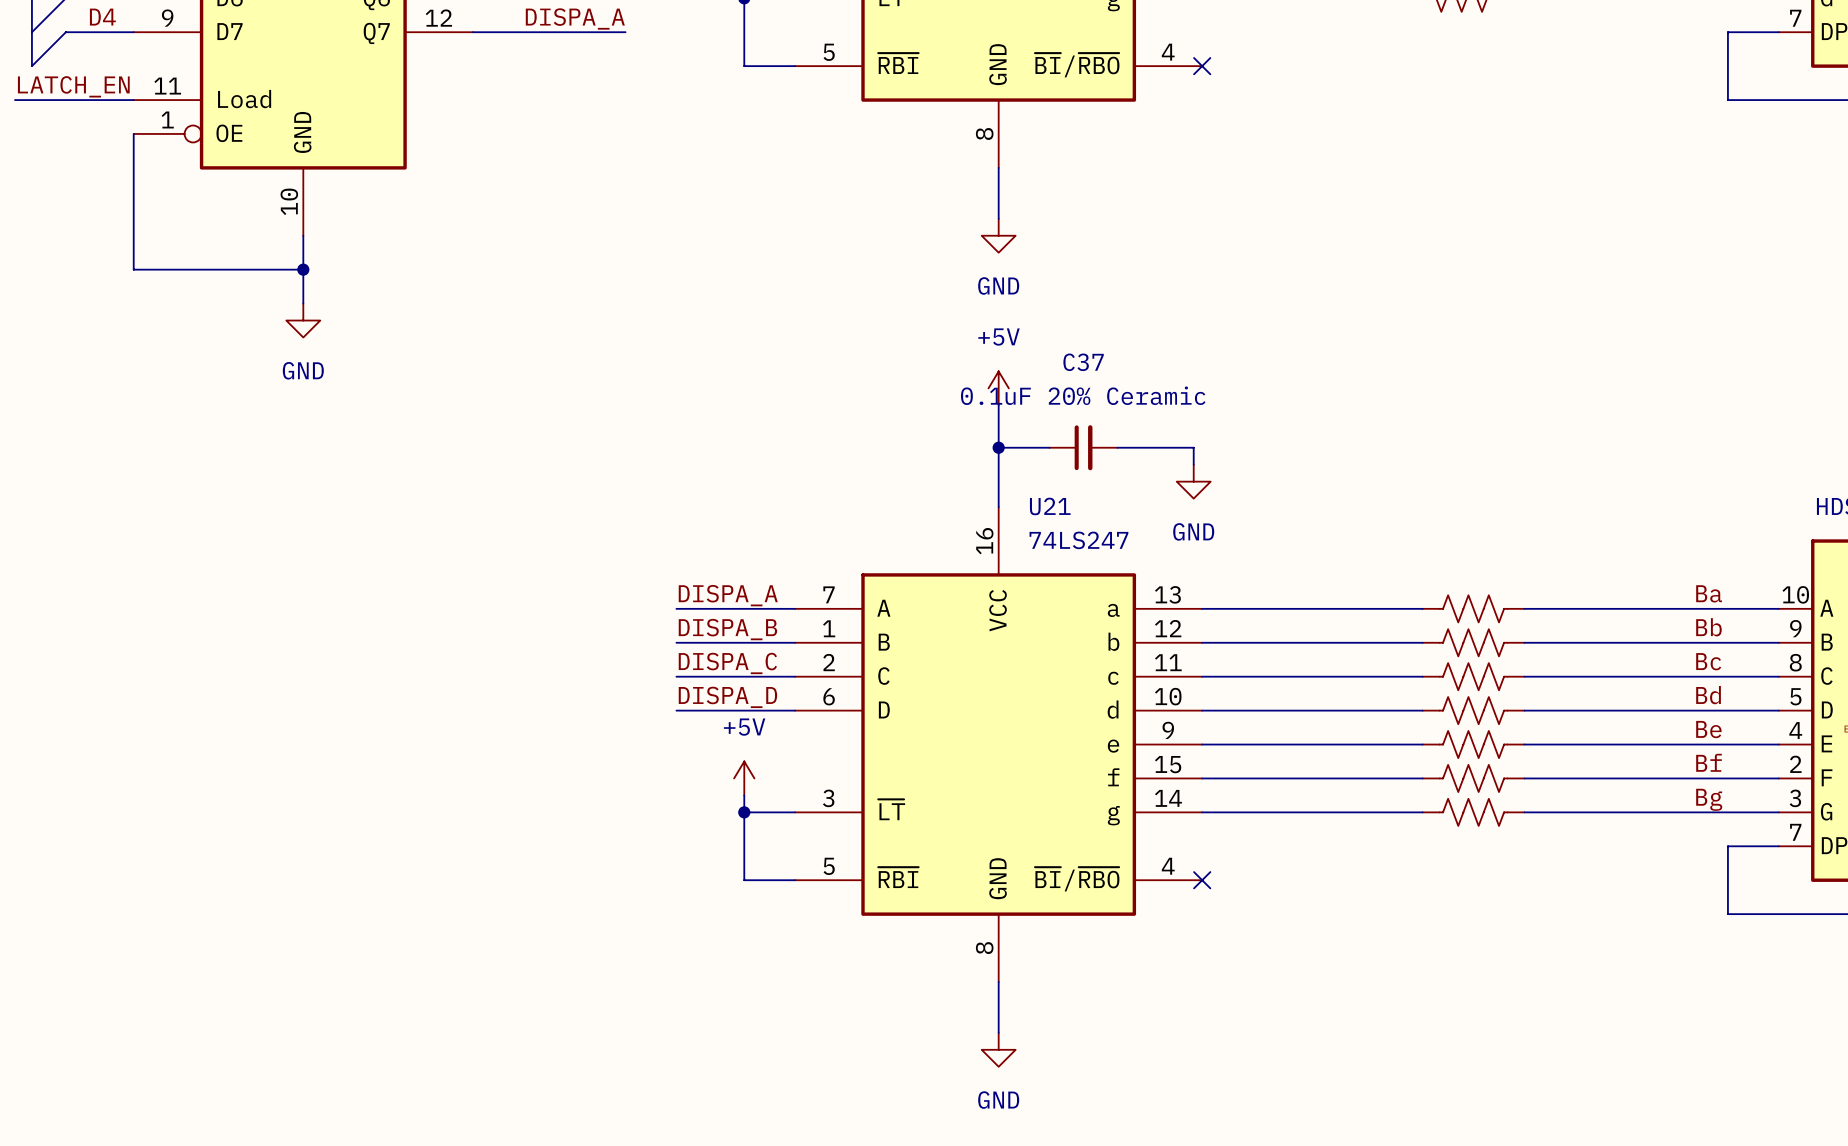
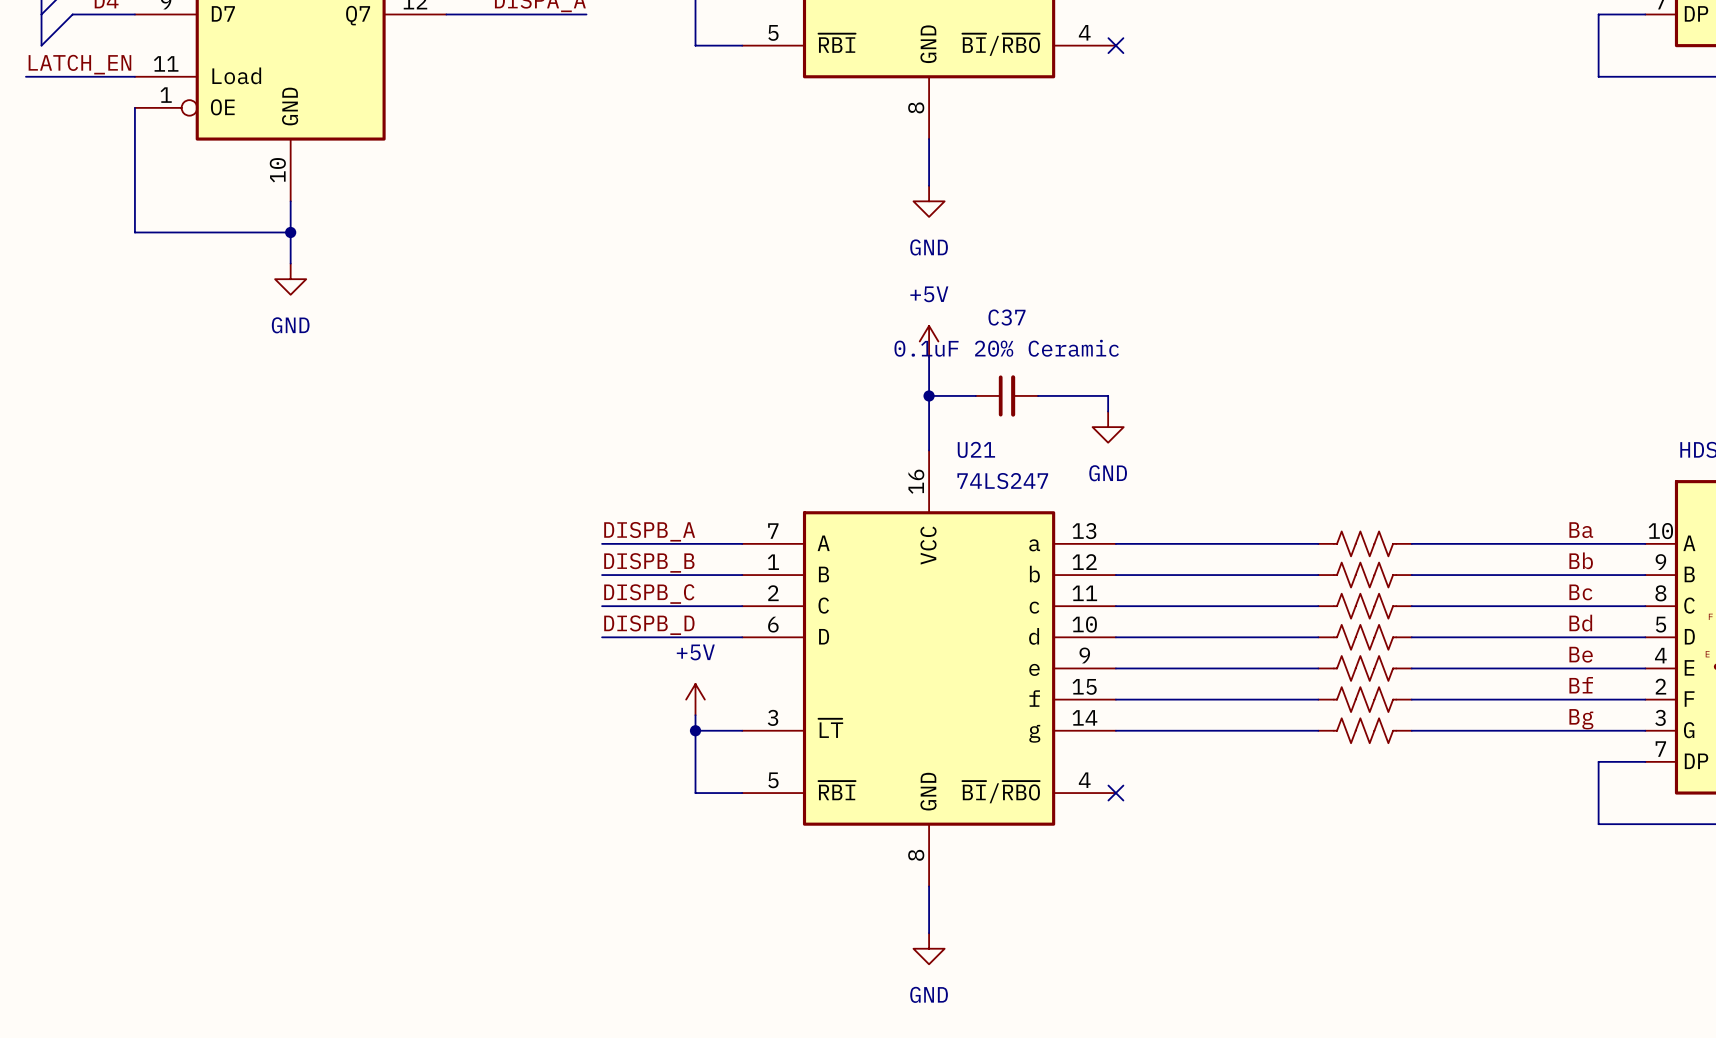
label: none -> DISPB_A (649, 531)
label: DISPA_A (728, 595) -> none
wire: none -> (602, 543) (633, 543)
label: none -> DISPB_B (649, 562)
label: DISPA_B (727, 629) -> none
wire: none -> (602, 575) (633, 575)
label: none -> DISPB_C (649, 594)
label: DISPA_C (727, 663) -> none
wire: none -> (602, 606) (633, 606)
label: none -> DISPB_D (649, 625)
label: DISPA_D (727, 697) -> none
wire: none -> (602, 637) (633, 637)

